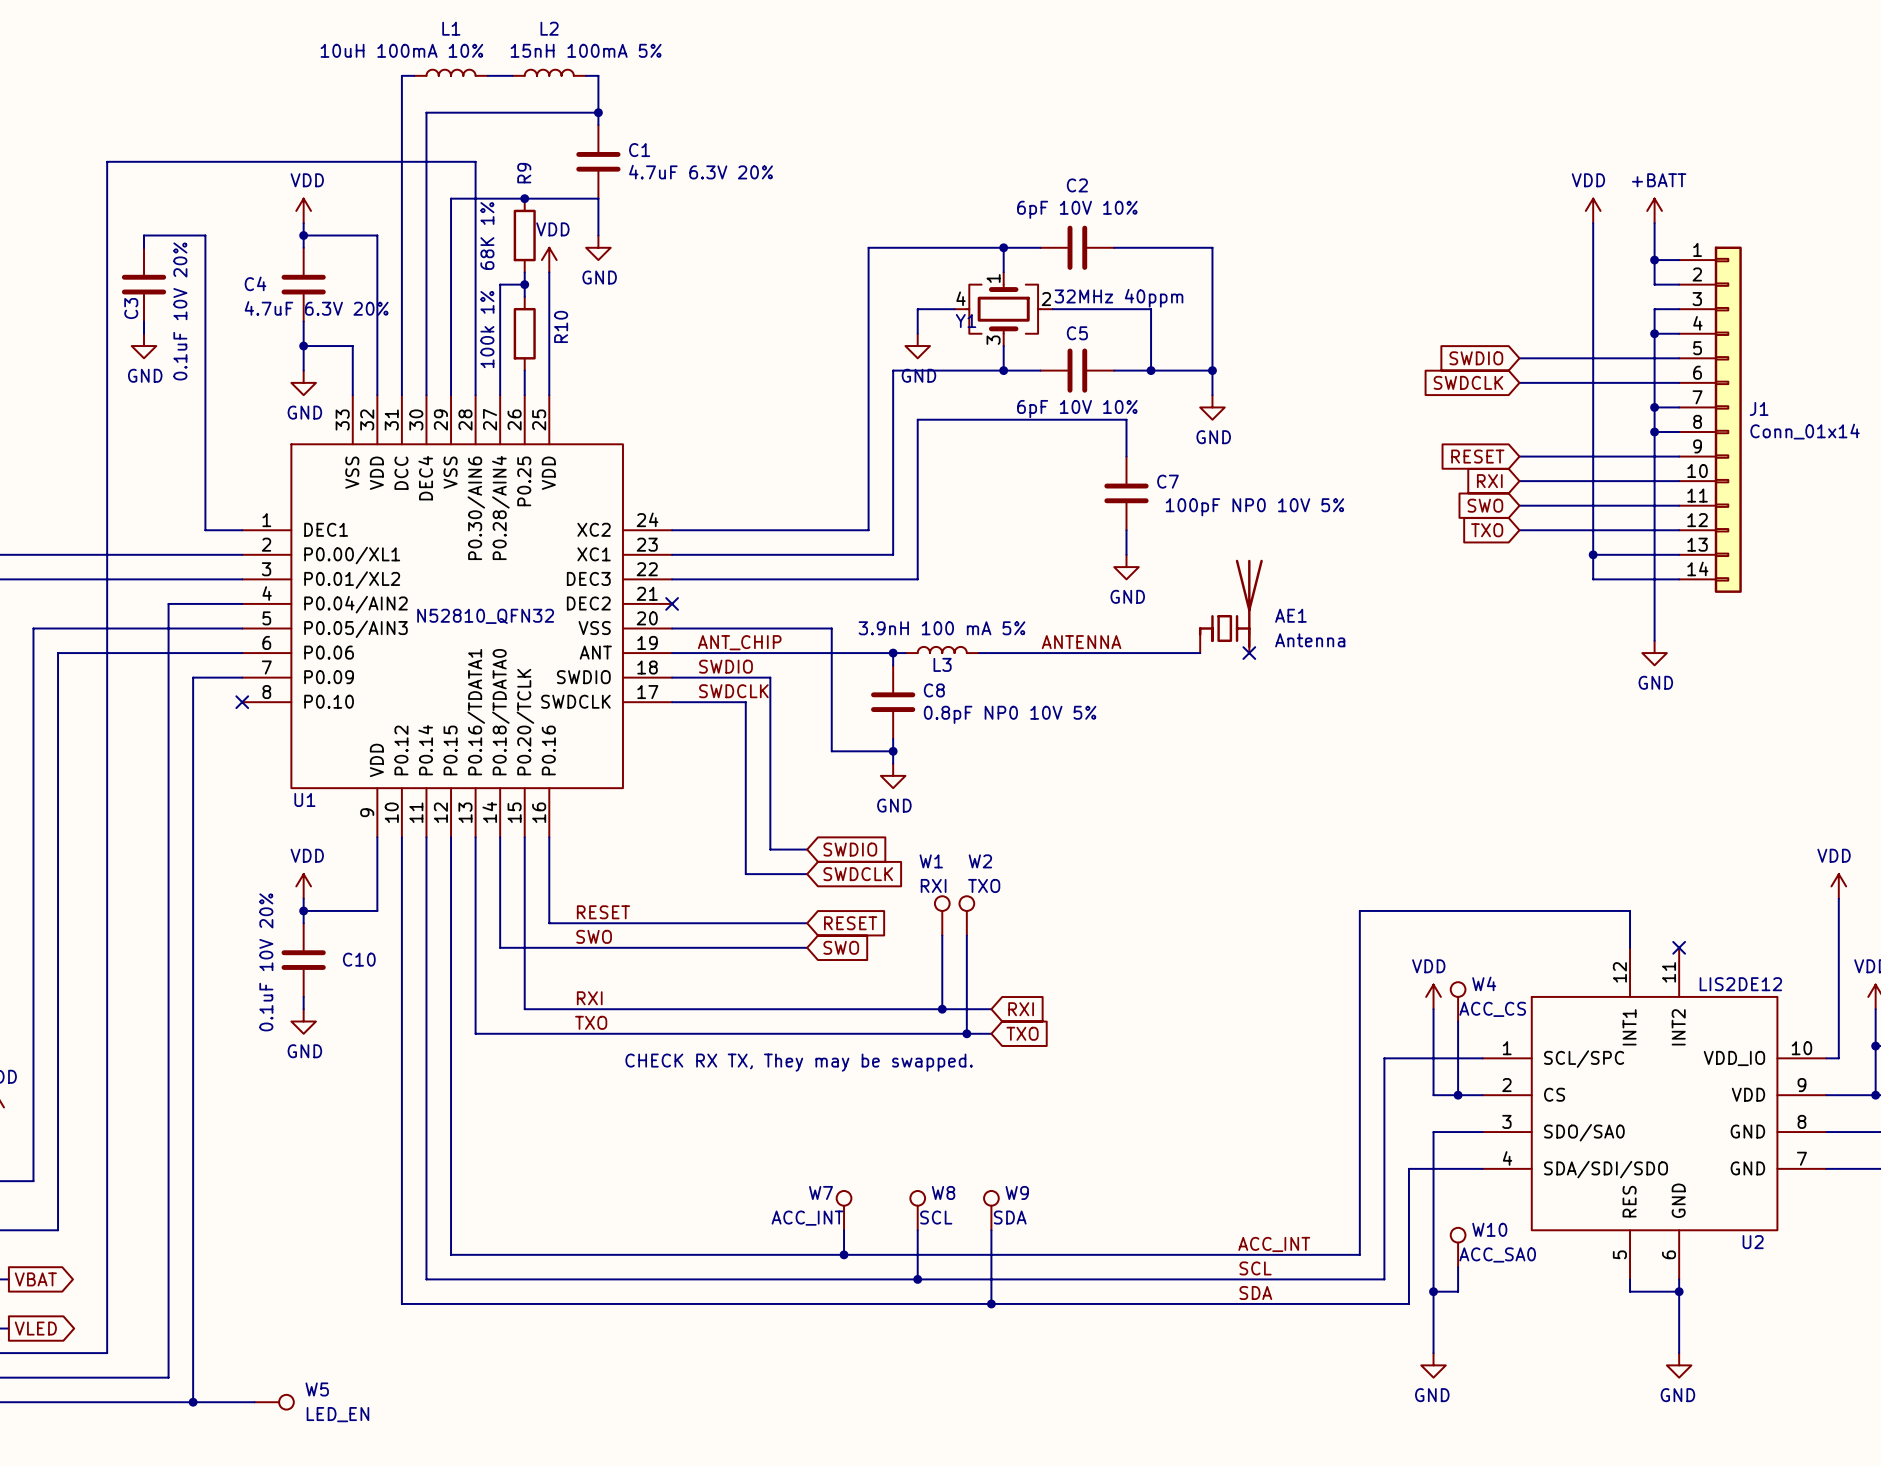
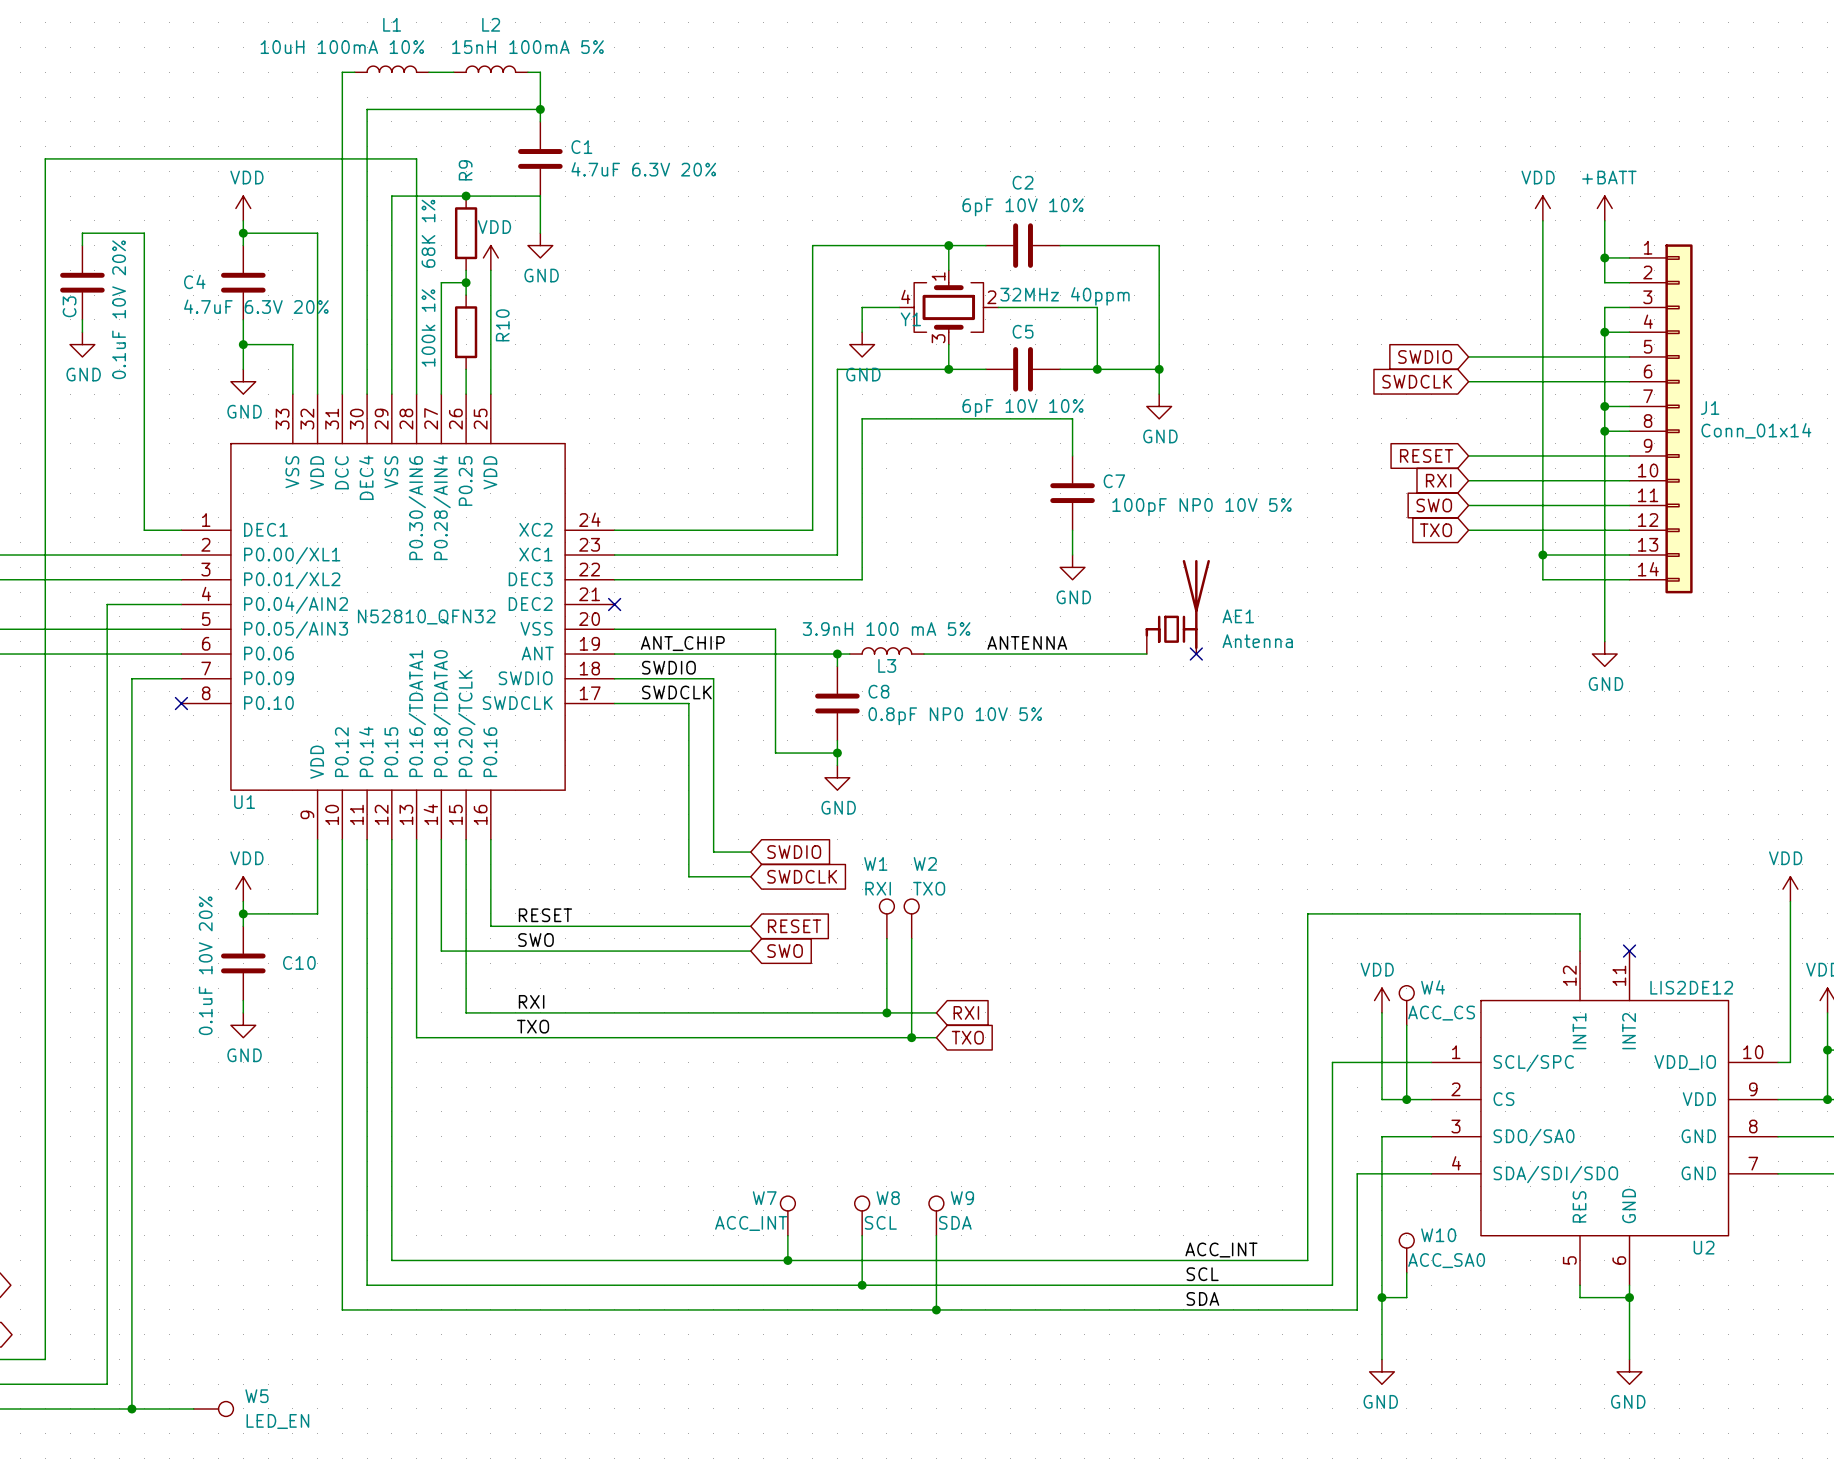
text: CHECK RX TX, They may be swapped. (799, 1062) -> none

